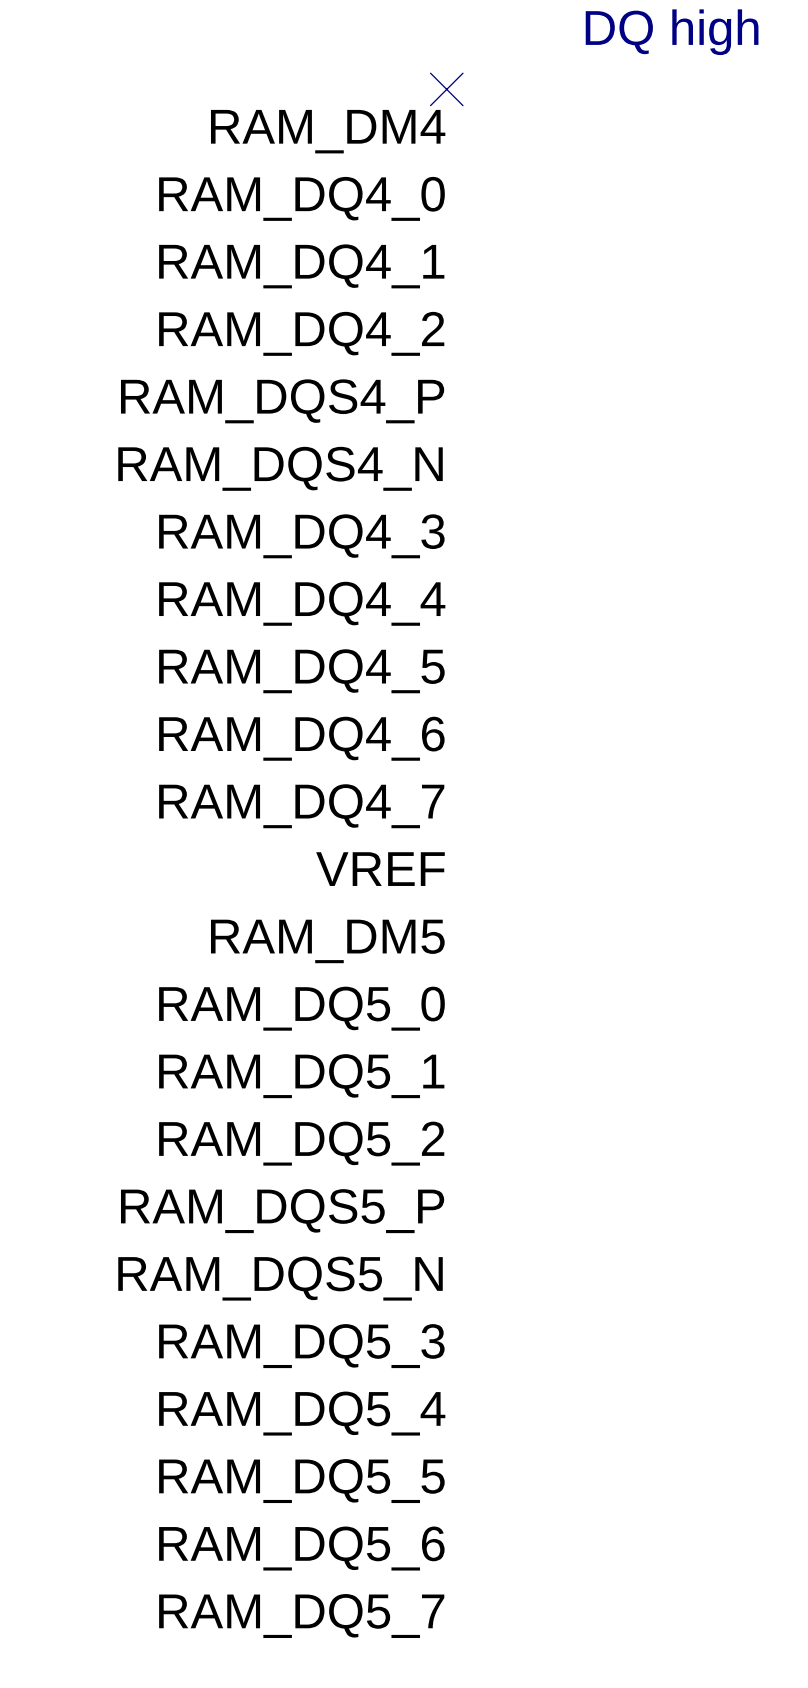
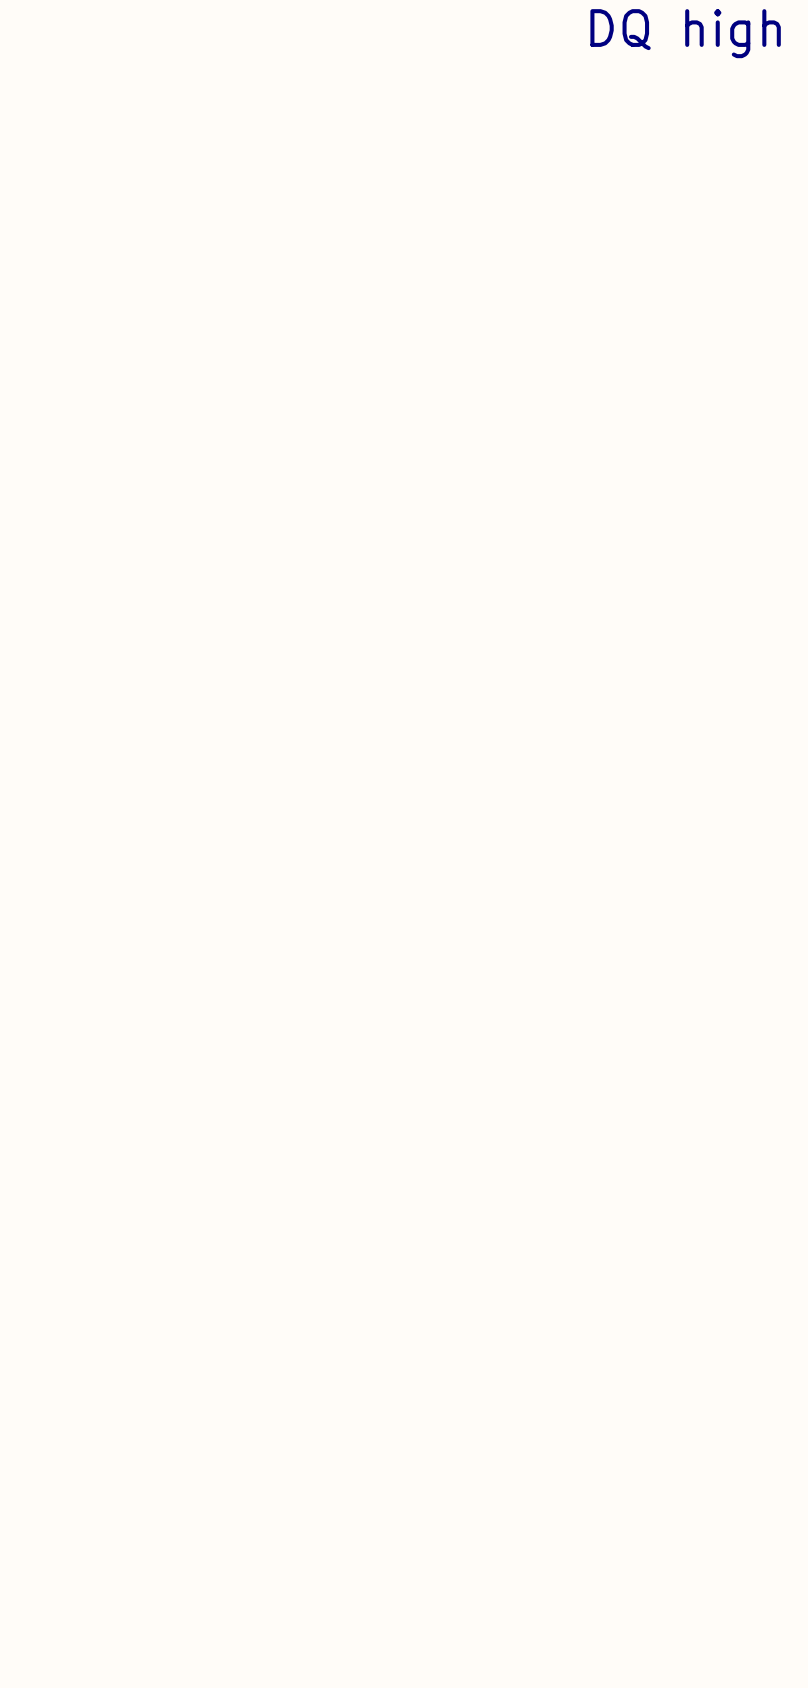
no-connect mark: (446, 89) -> none
label: RAM_DM4 (328, 131) -> none
label: RAM_DQ4_0 (301, 198) -> none
label: RAM_DQ4_1 (301, 266) -> none
label: RAM_DQ4_2 (301, 333) -> none
label: RAM_DQS4_P (282, 401) -> none
label: RAM_DQS4_N (280, 468) -> none
label: RAM_DQ4_3 (301, 536) -> none
label: RAM_DQ4_4 (302, 603) -> none
label: RAM_DQ4_5 (301, 671) -> none
label: RAM_DQ4_6 (301, 738) -> none
label: RAM_DQ4_7 (301, 806) -> none
label: VREF (380, 869) -> none
label: RAM_DM5 (327, 941) -> none
label: RAM_DQ5_0 (301, 1008) -> none
label: RAM_DQ5_1 (301, 1076) -> none
label: RAM_DQ5_2 (301, 1143) -> none
label: RAM_DQS5_P (282, 1211) -> none
label: RAM_DQS5_N (280, 1278) -> none
label: RAM_DQ5_3 (301, 1346) -> none
label: RAM_DQ5_4 (302, 1413) -> none
label: RAM_DQ5_5 (301, 1481) -> none
label: RAM_DQ5_6 (301, 1548) -> none
label: RAM_DQ5_7 (301, 1616) -> none

